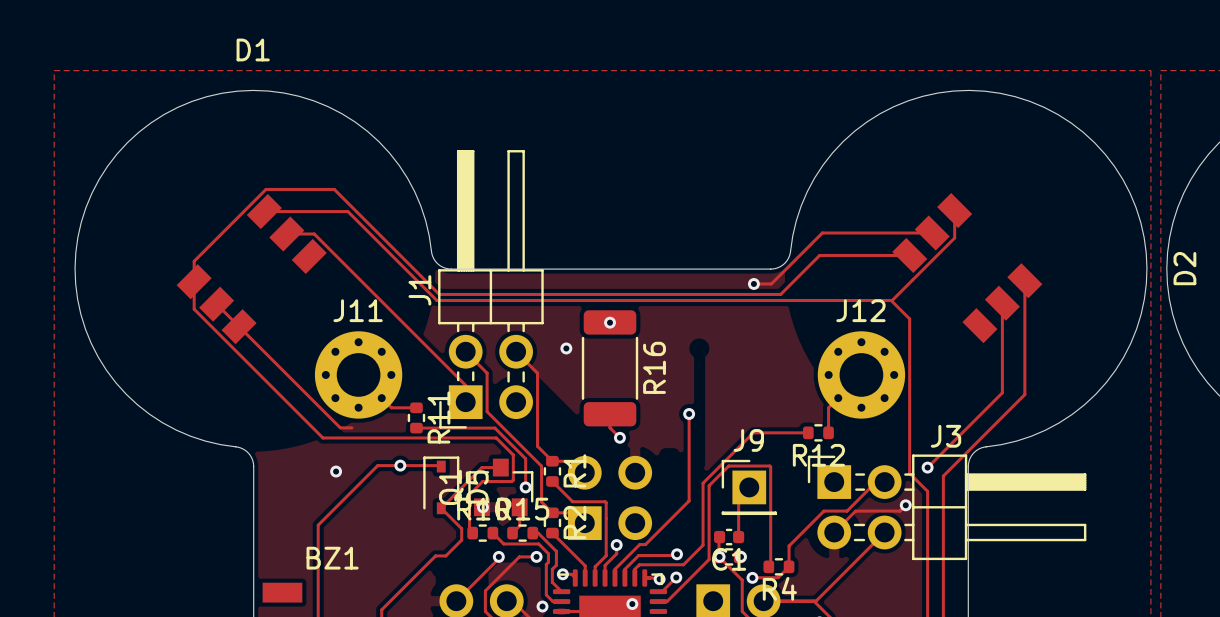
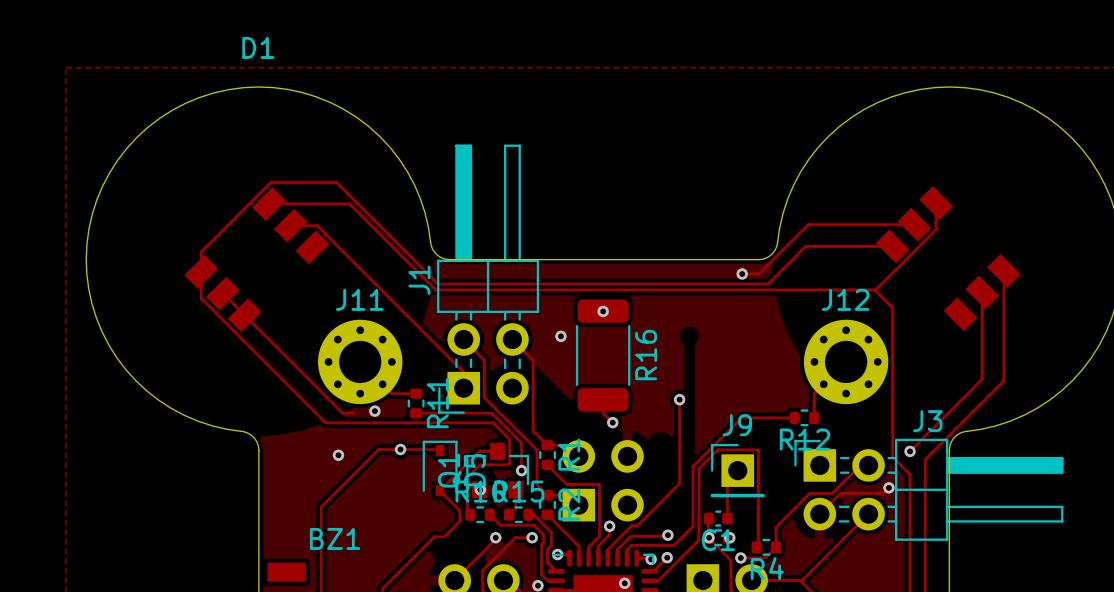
via: none -> (374, 411)

